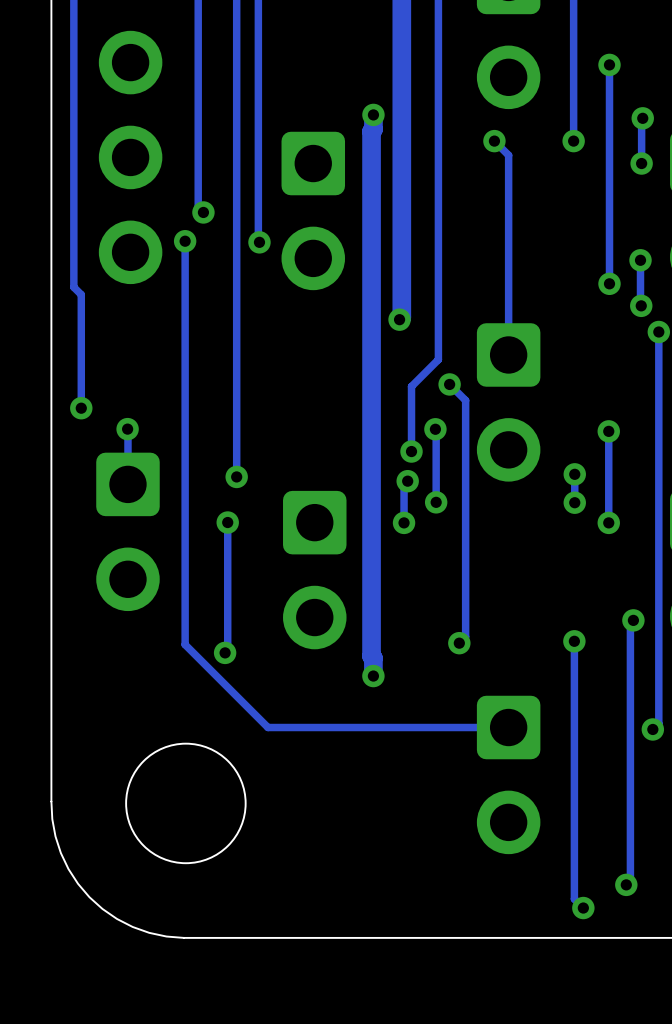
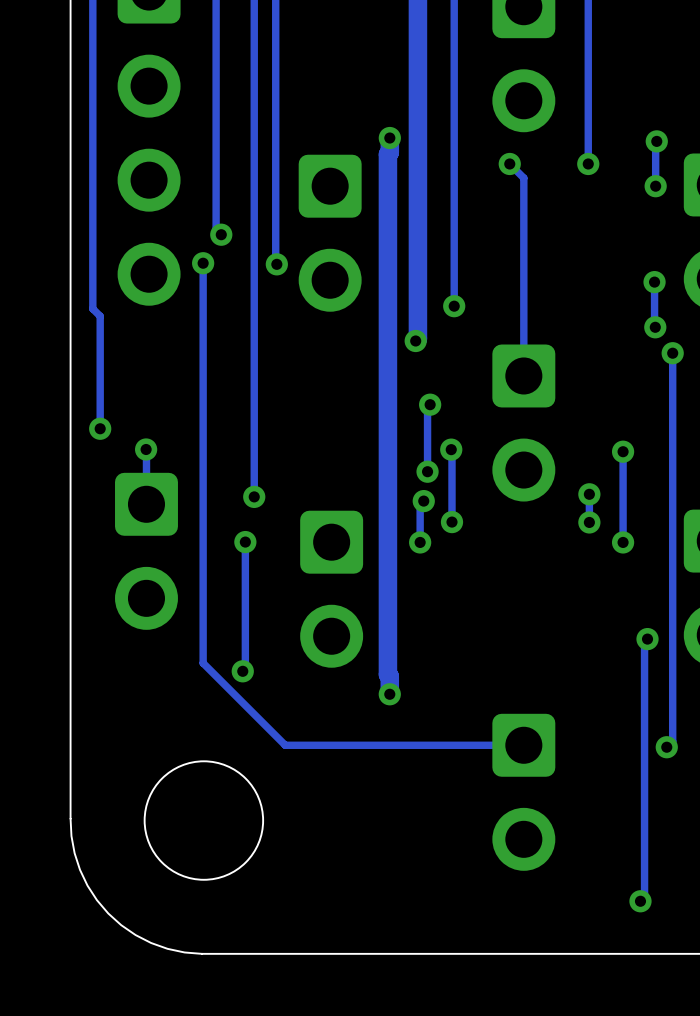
track: (609, 64) (609, 283) -> none
via: (609, 64) -> none
via: (609, 283) -> none
track: (438, 284) (438, 359) (414, 383) -> none
via: none -> (454, 306)
track: (449, 384) (465, 400) (465, 636) (459, 643) -> none
via position: (449, 384) -> (430, 404)
track: (574, 641) (574, 899) (583, 908) -> none
via: (574, 641) -> none
via: (459, 643) -> none
via: (583, 908) -> none

